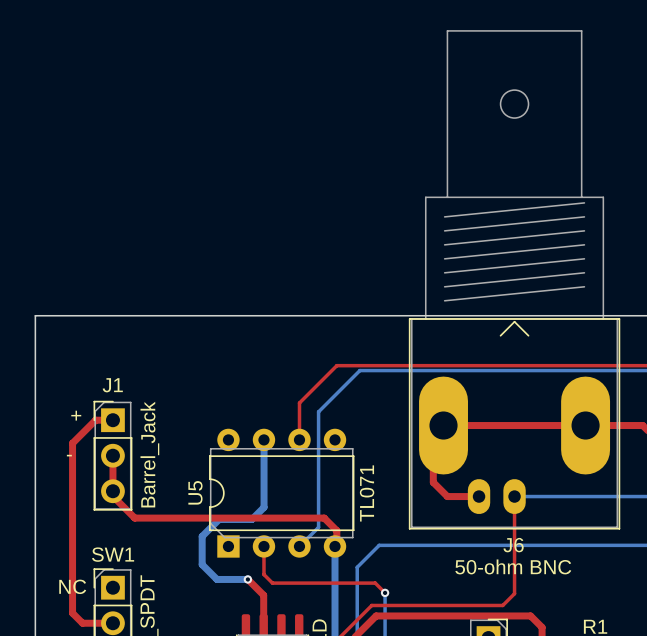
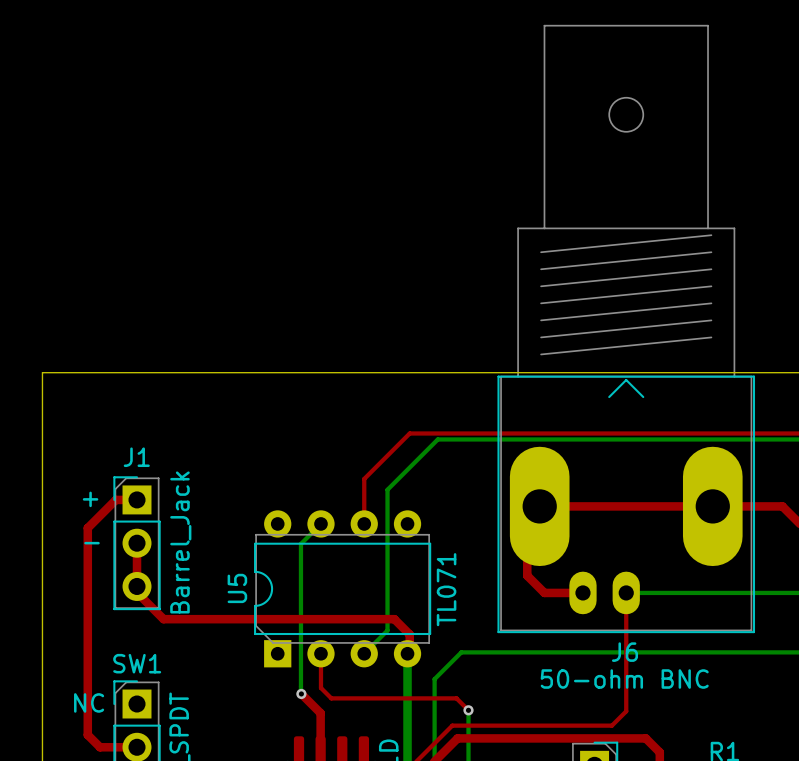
bottom track: (264, 439) (264, 507) (251, 519) (219, 519) (202, 536) (202, 564) (216, 579) (247, 579) -> (320, 523) (300, 543) (301, 693)

